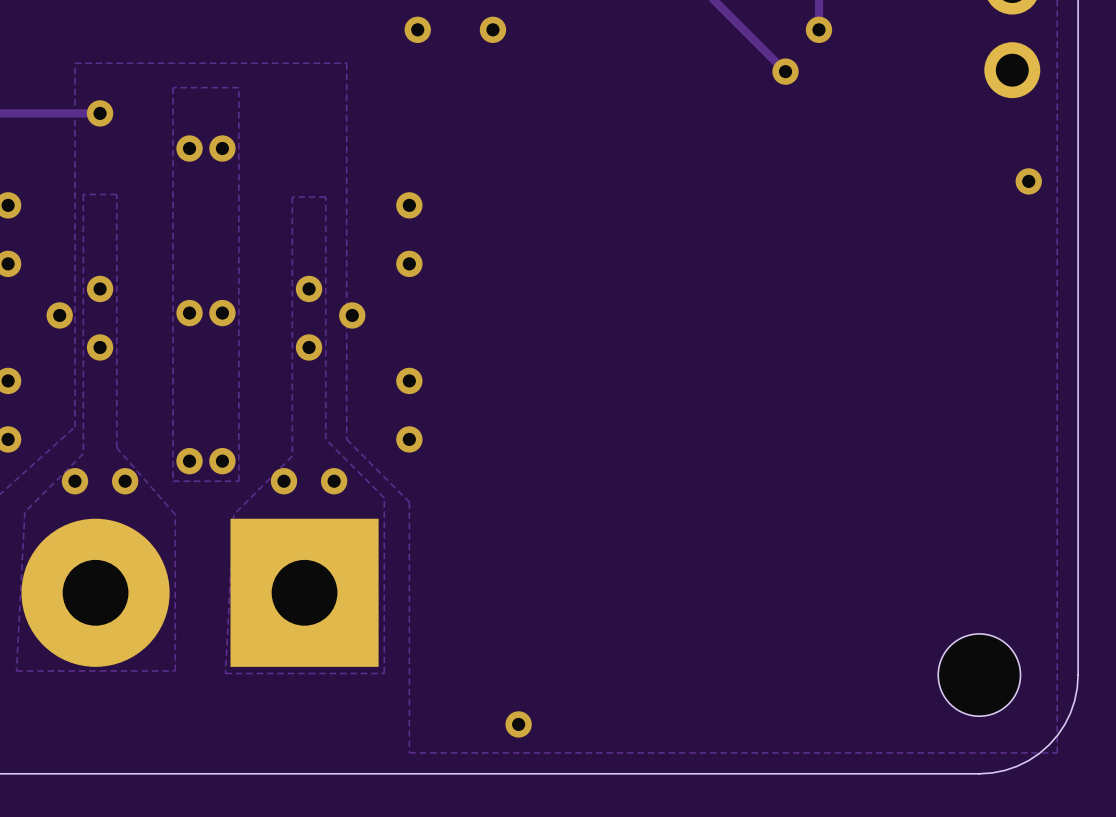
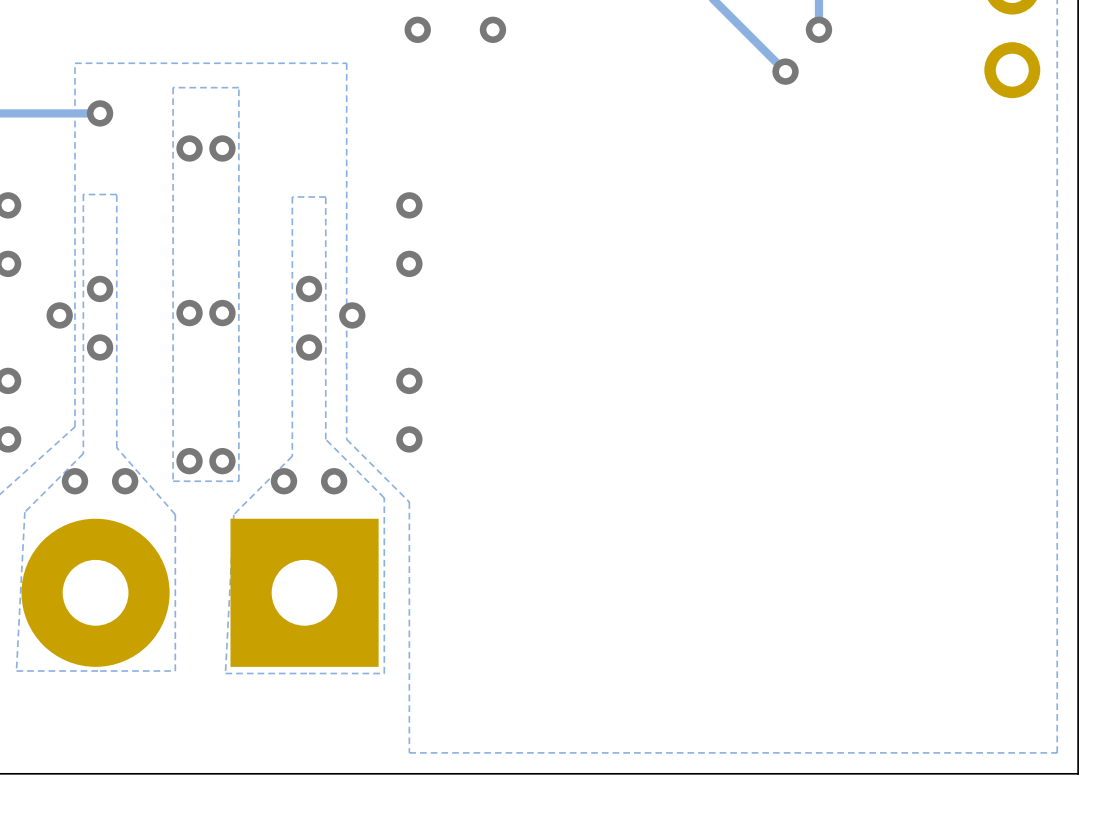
via: (1028, 181) -> none
part: (979, 675) -> none
board edge: (1078, 675) (1077, 687) (1070, 712) (1064, 724) (1049, 744) (1028, 760) (1017, 766) (992, 772) (979, 773) -> (1078, 675) (1078, 773) (979, 773)
via: (518, 724) -> none

